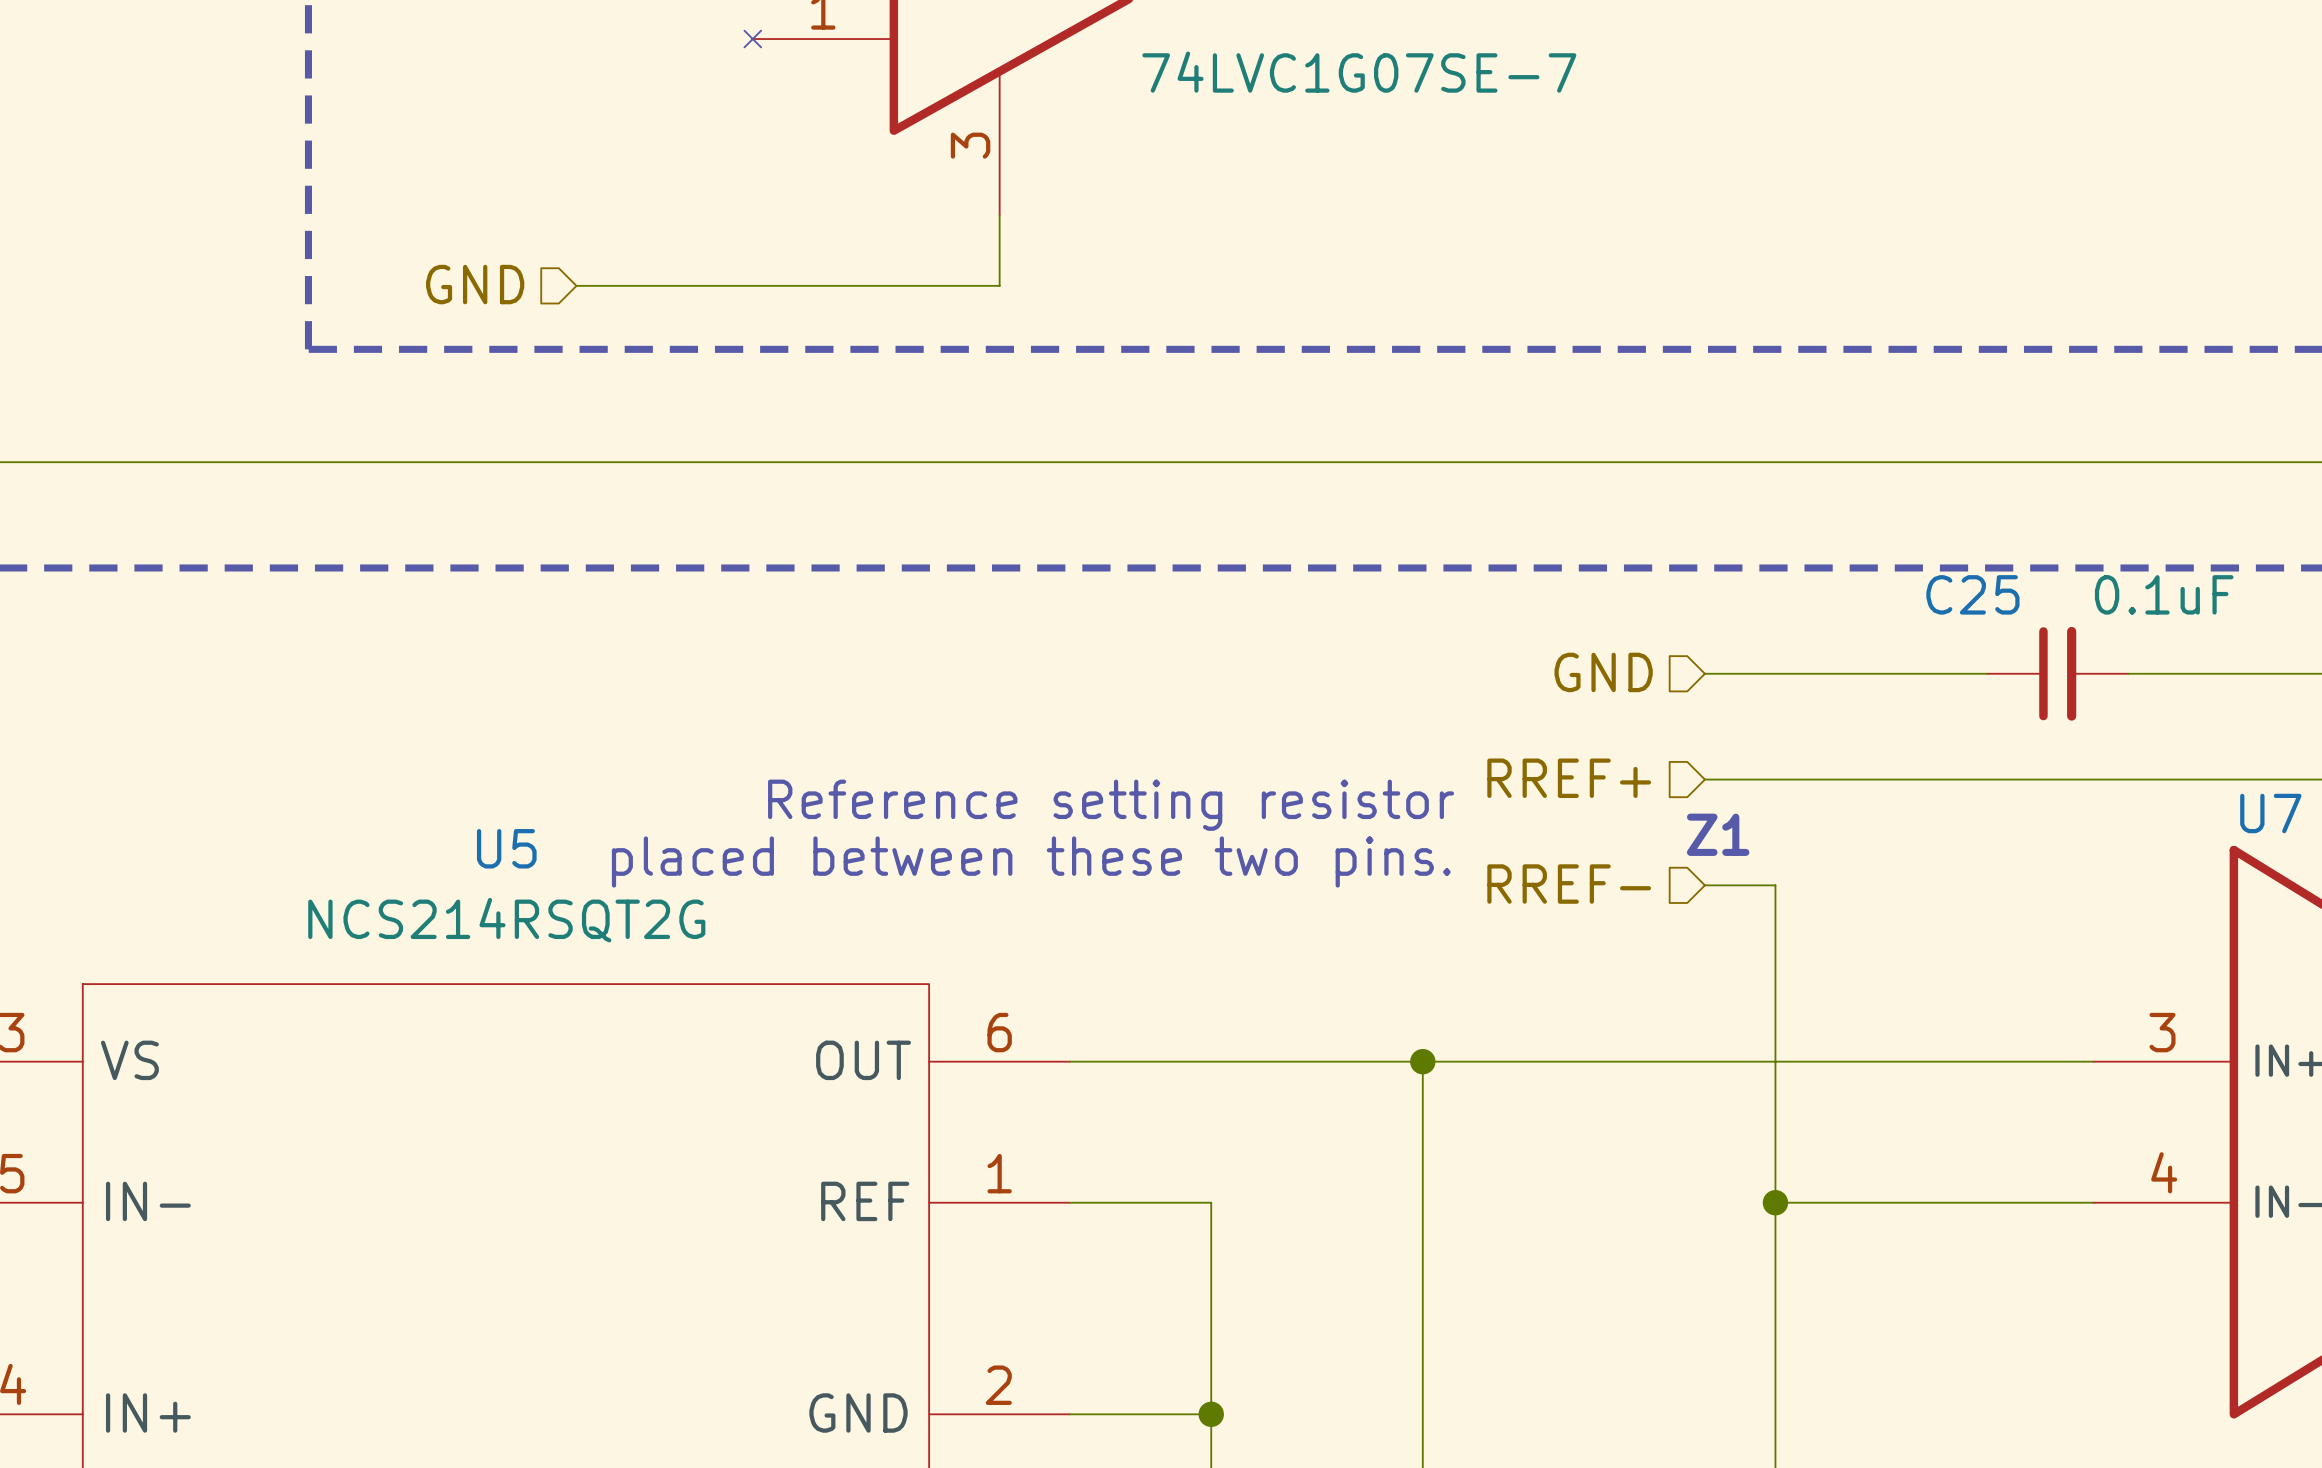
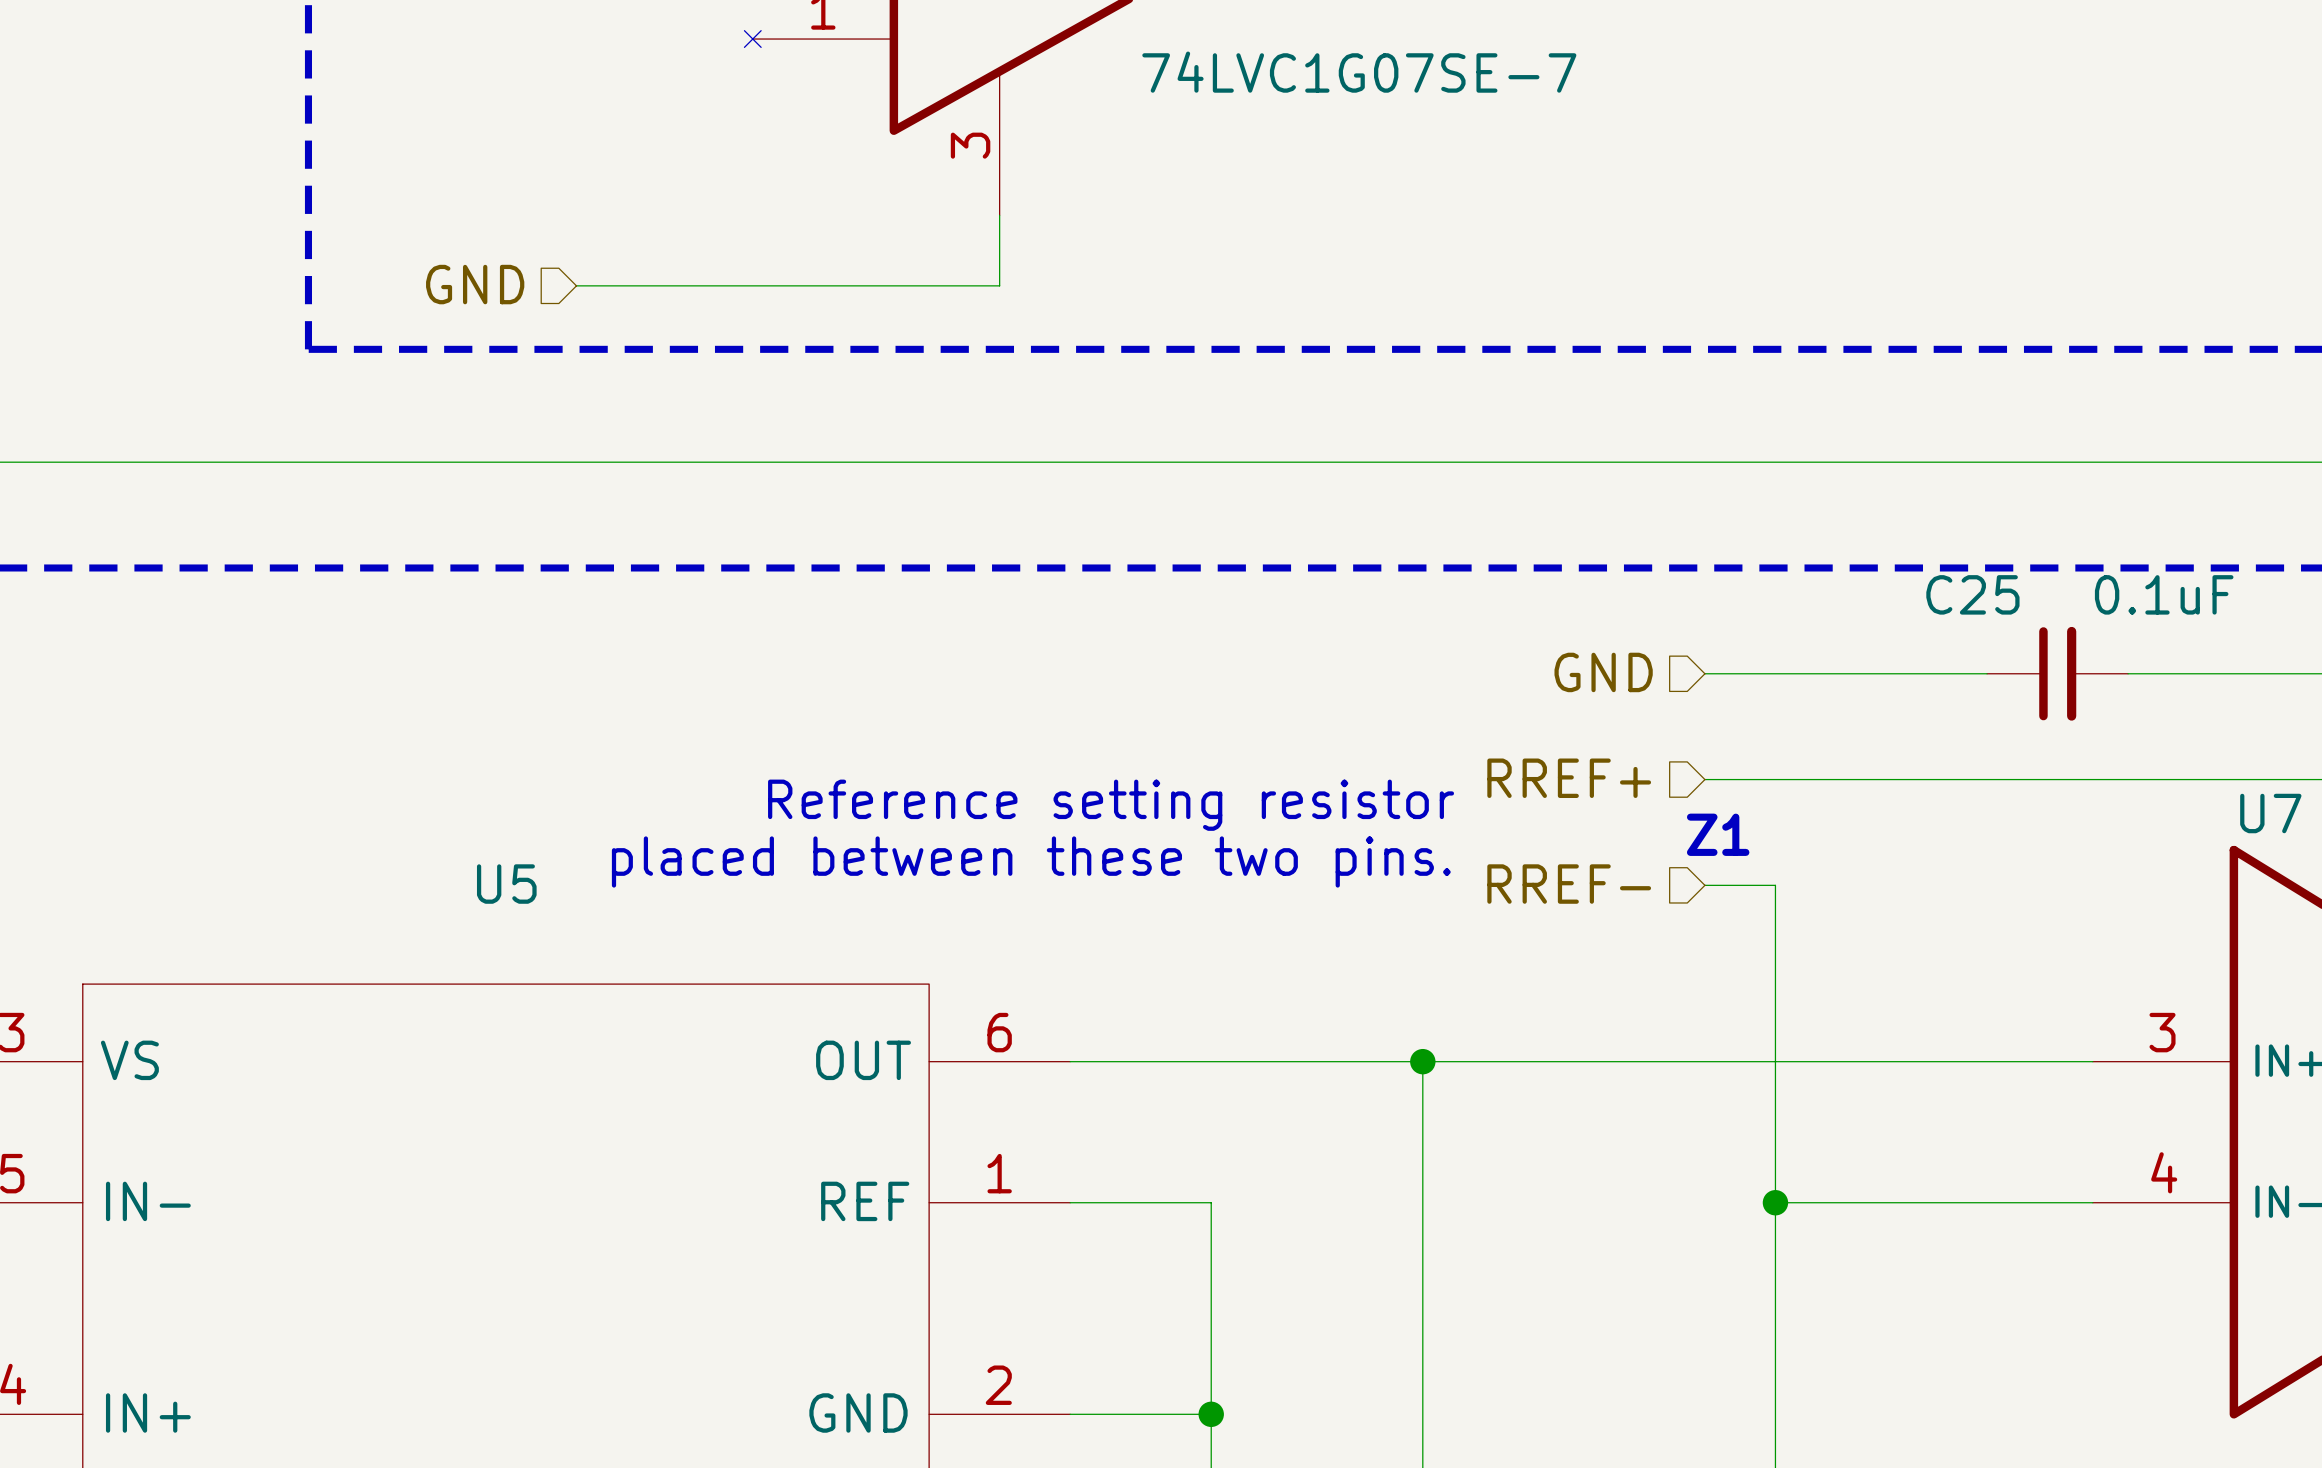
U5 name position: U5 (506, 848) -> U5 (506, 884)
U5 value: NCS214RSQT2G (506, 920) -> none

